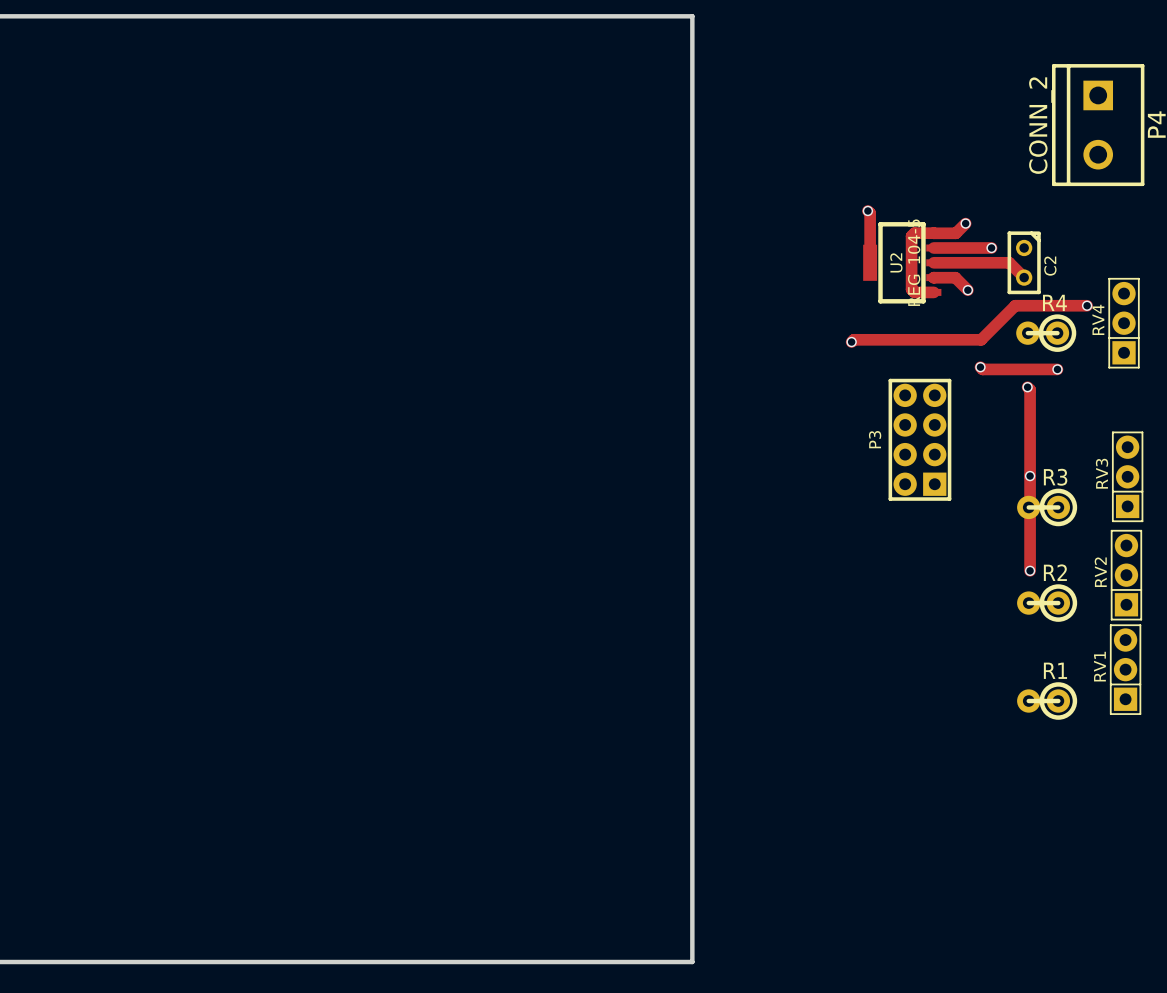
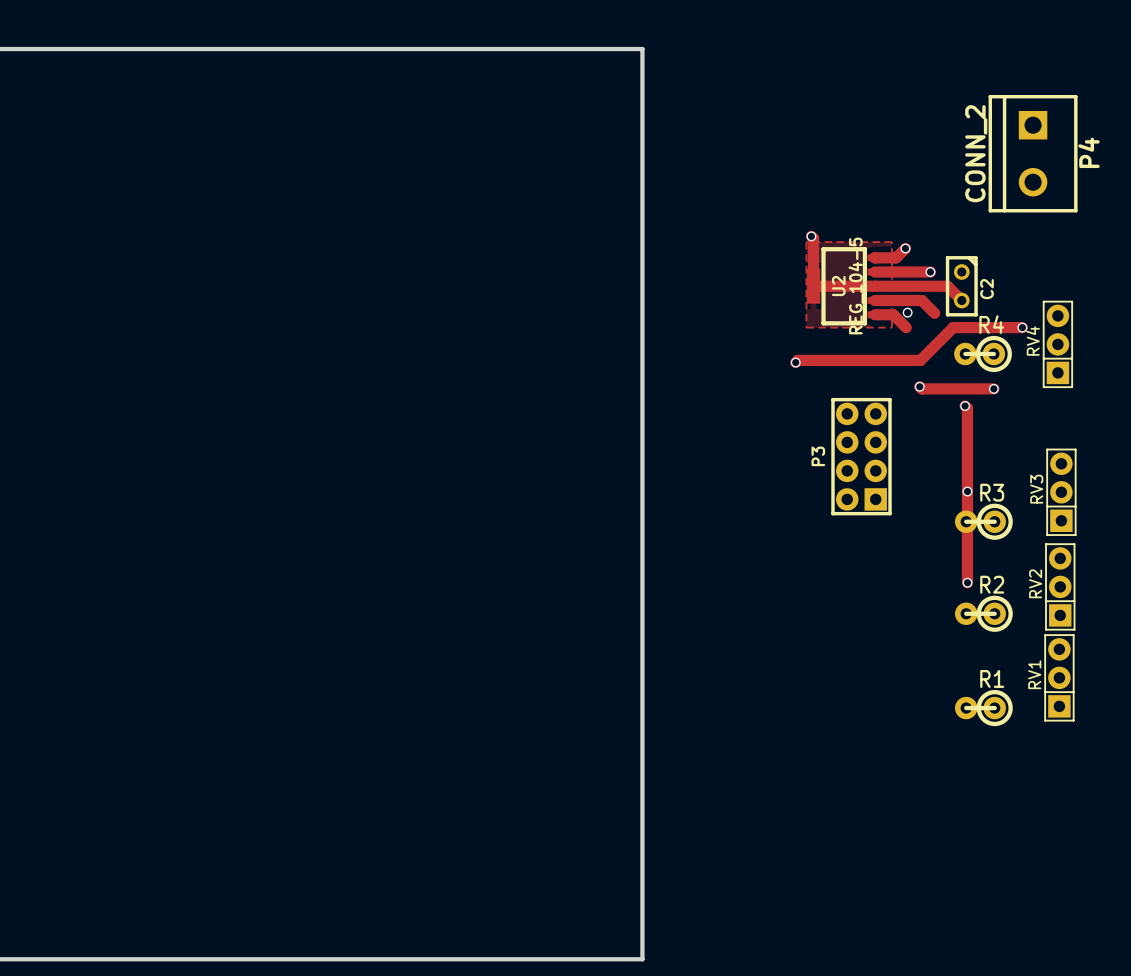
zone outline: none -> (806, 242) (891, 242) (891, 327) (806, 327) (806, 242)
track: (933, 233) (914, 233) (911, 236) (911, 289) (914, 292) (933, 292) -> (906, 327) (893, 314) (874, 314)
track: none -> (813, 286) (874, 286)
track: (933, 277) (955, 277) (967, 290) -> (874, 300) (921, 300) (934, 313)

